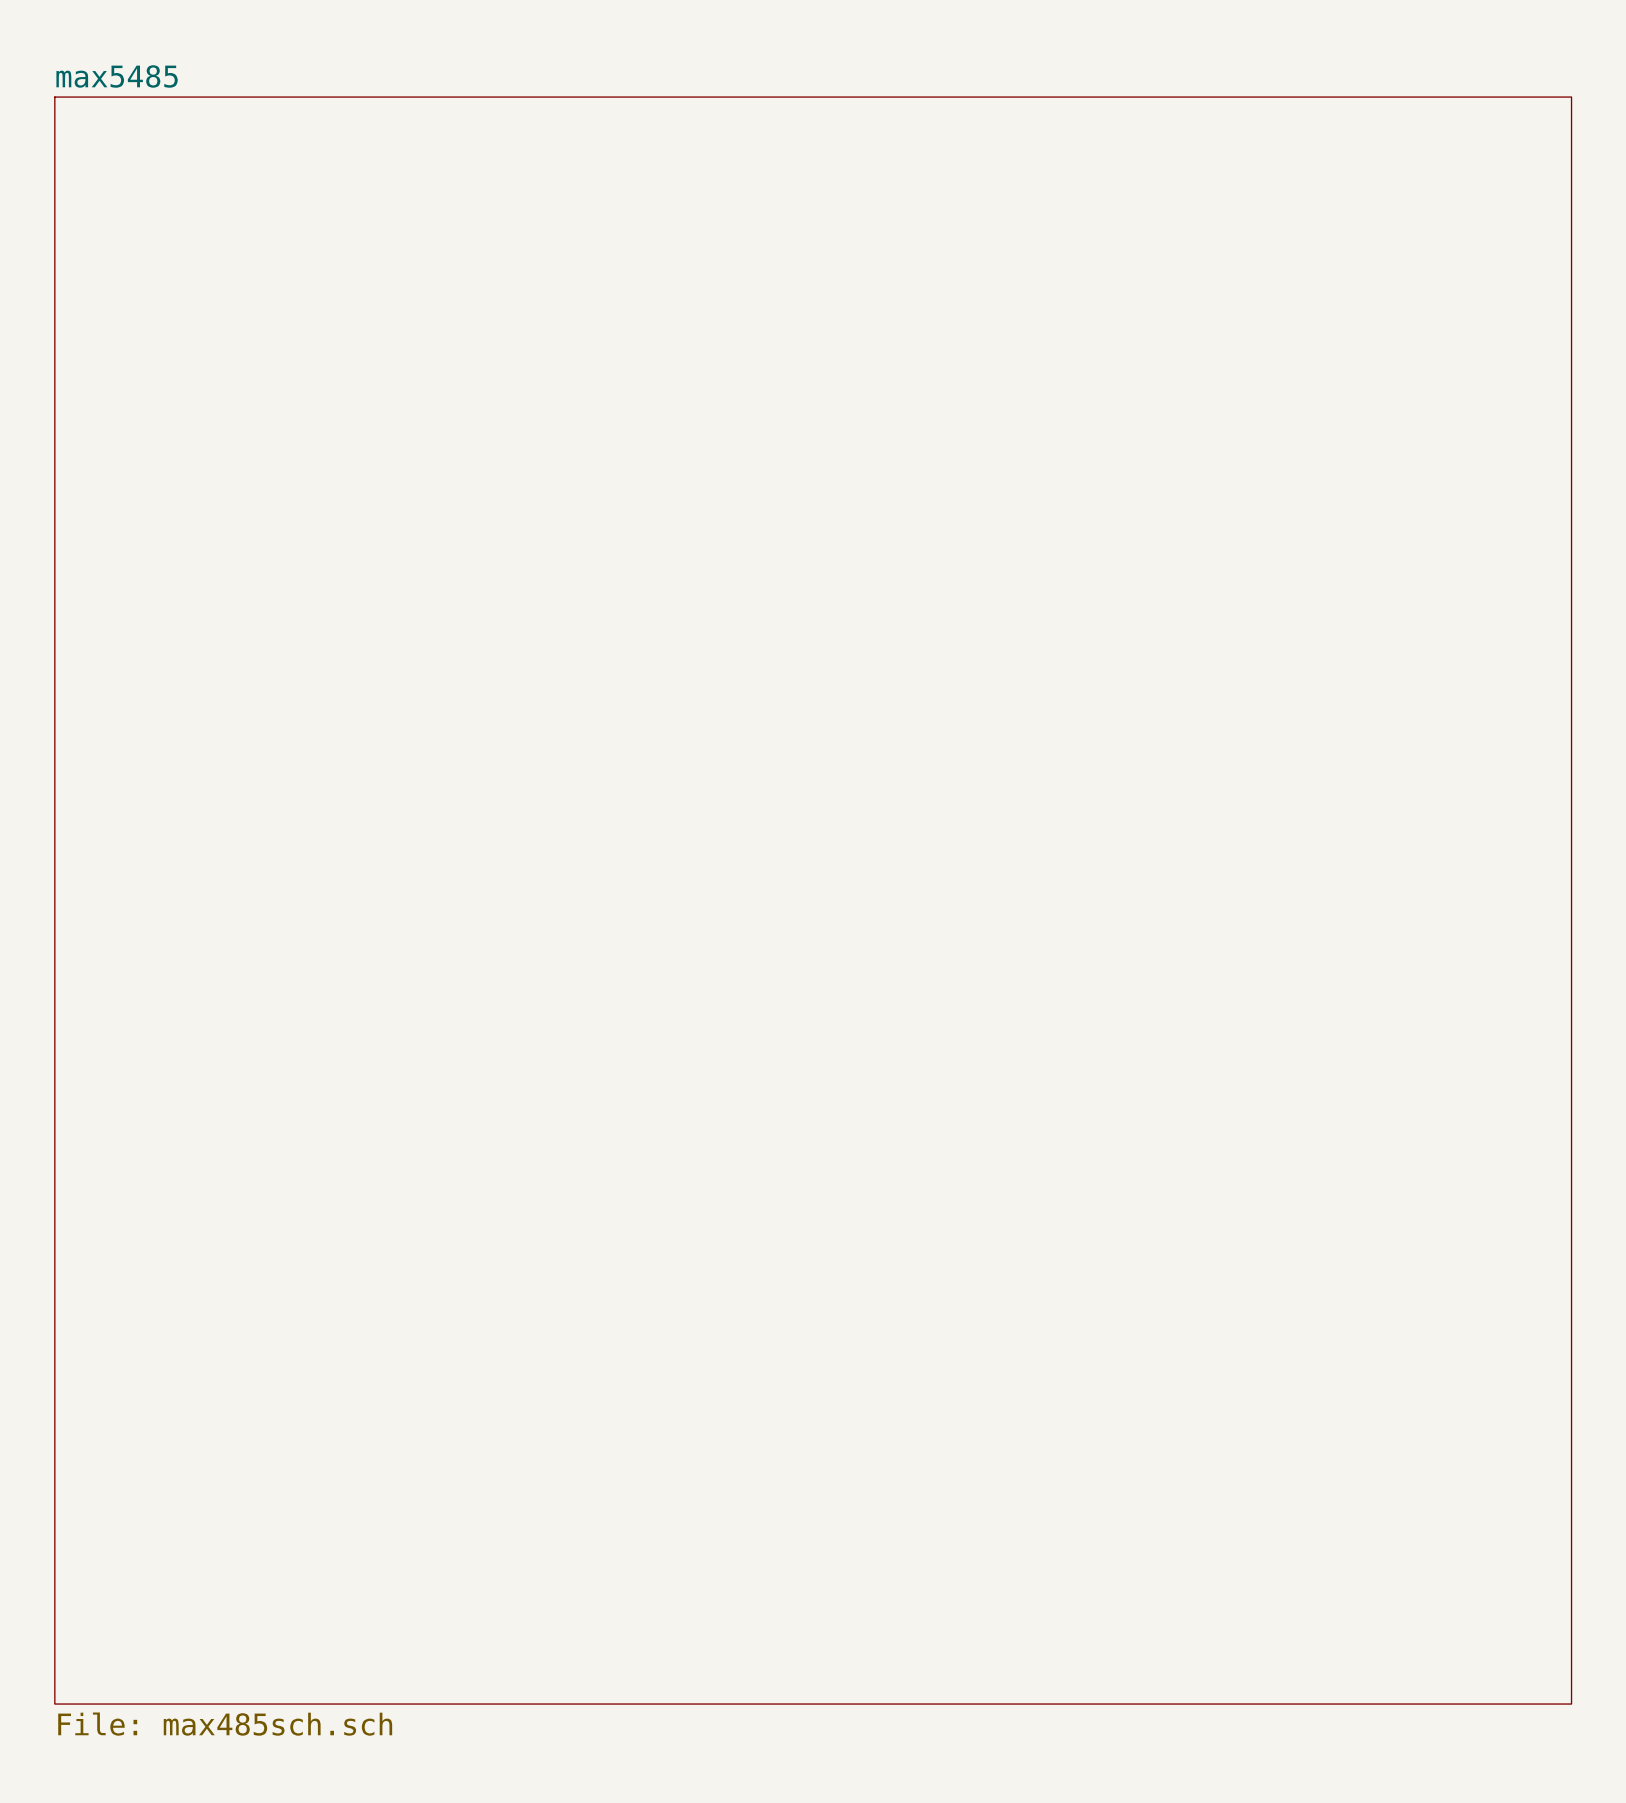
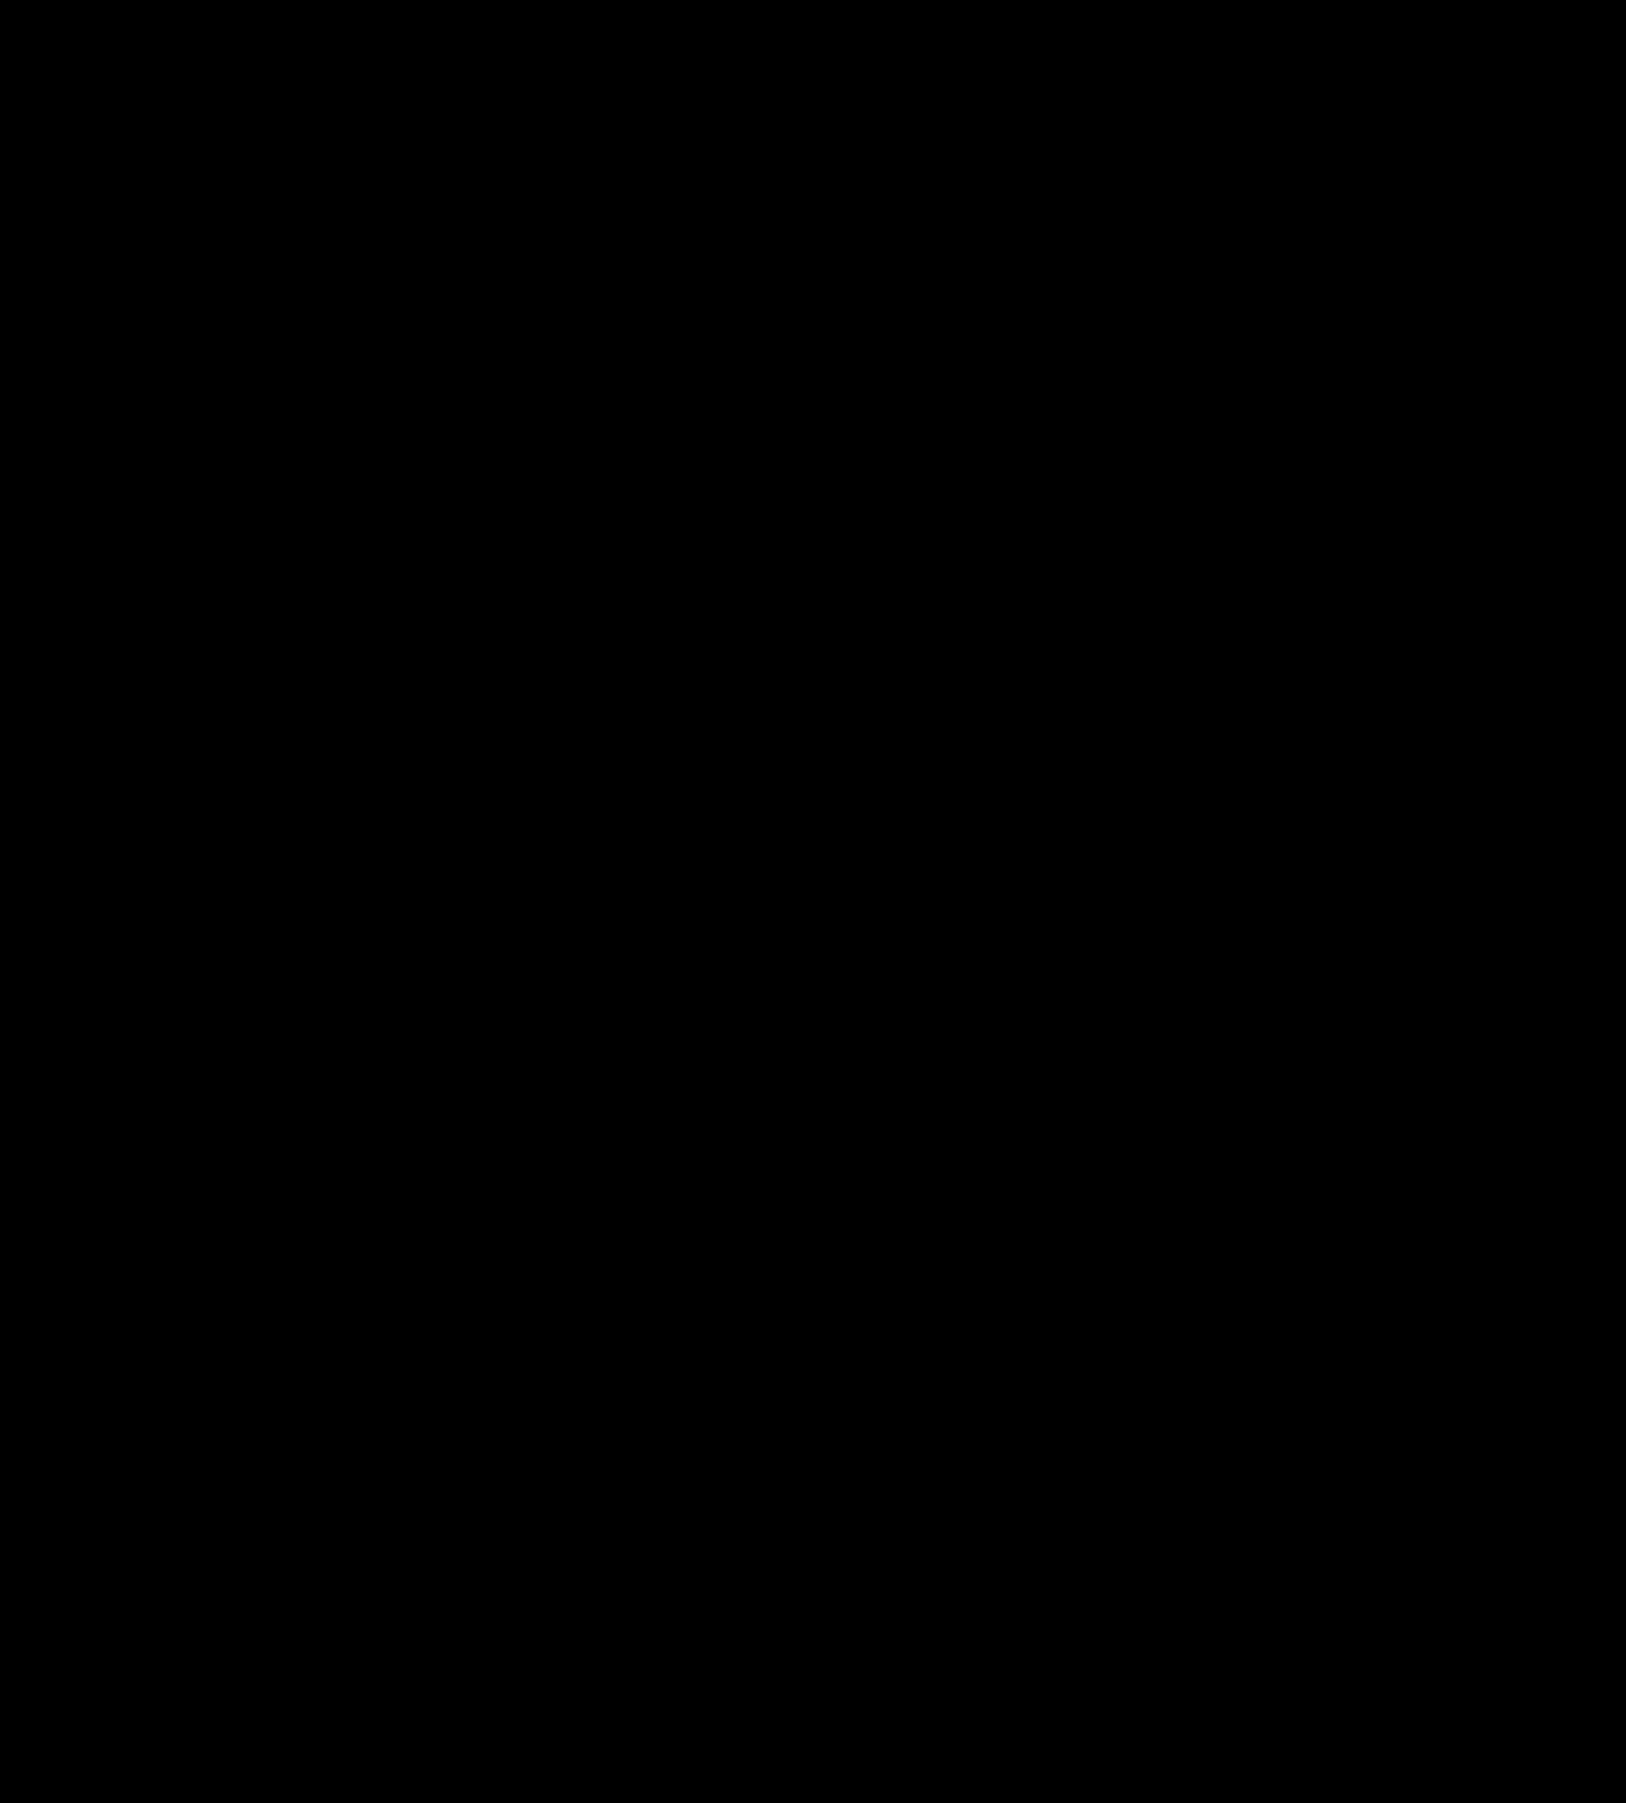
sheet max5485: File: max485sch.sch (813, 900) -> none

